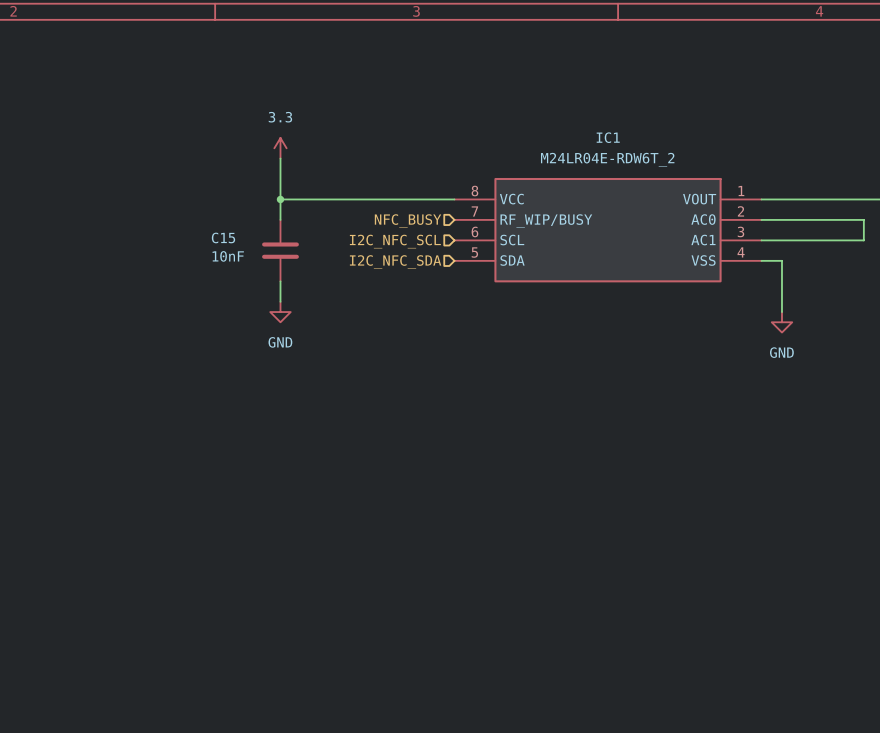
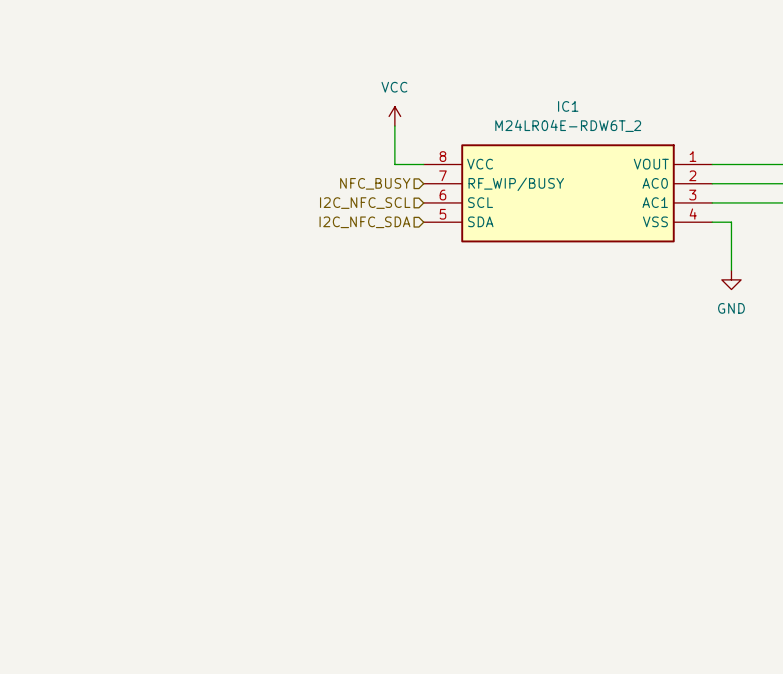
power symbol: 3.3 (280, 148) -> none
power symbol: none -> VCC (394, 116)
wire: (280, 158) (280, 219) -> none
wire: (280, 199) (423, 199) -> (394, 126) (394, 164)
junction: (280, 199) -> none
C15: 10nF (280, 250) -> none
wire: (280, 281) (280, 301) -> none
power symbol: GND (280, 312) -> none

